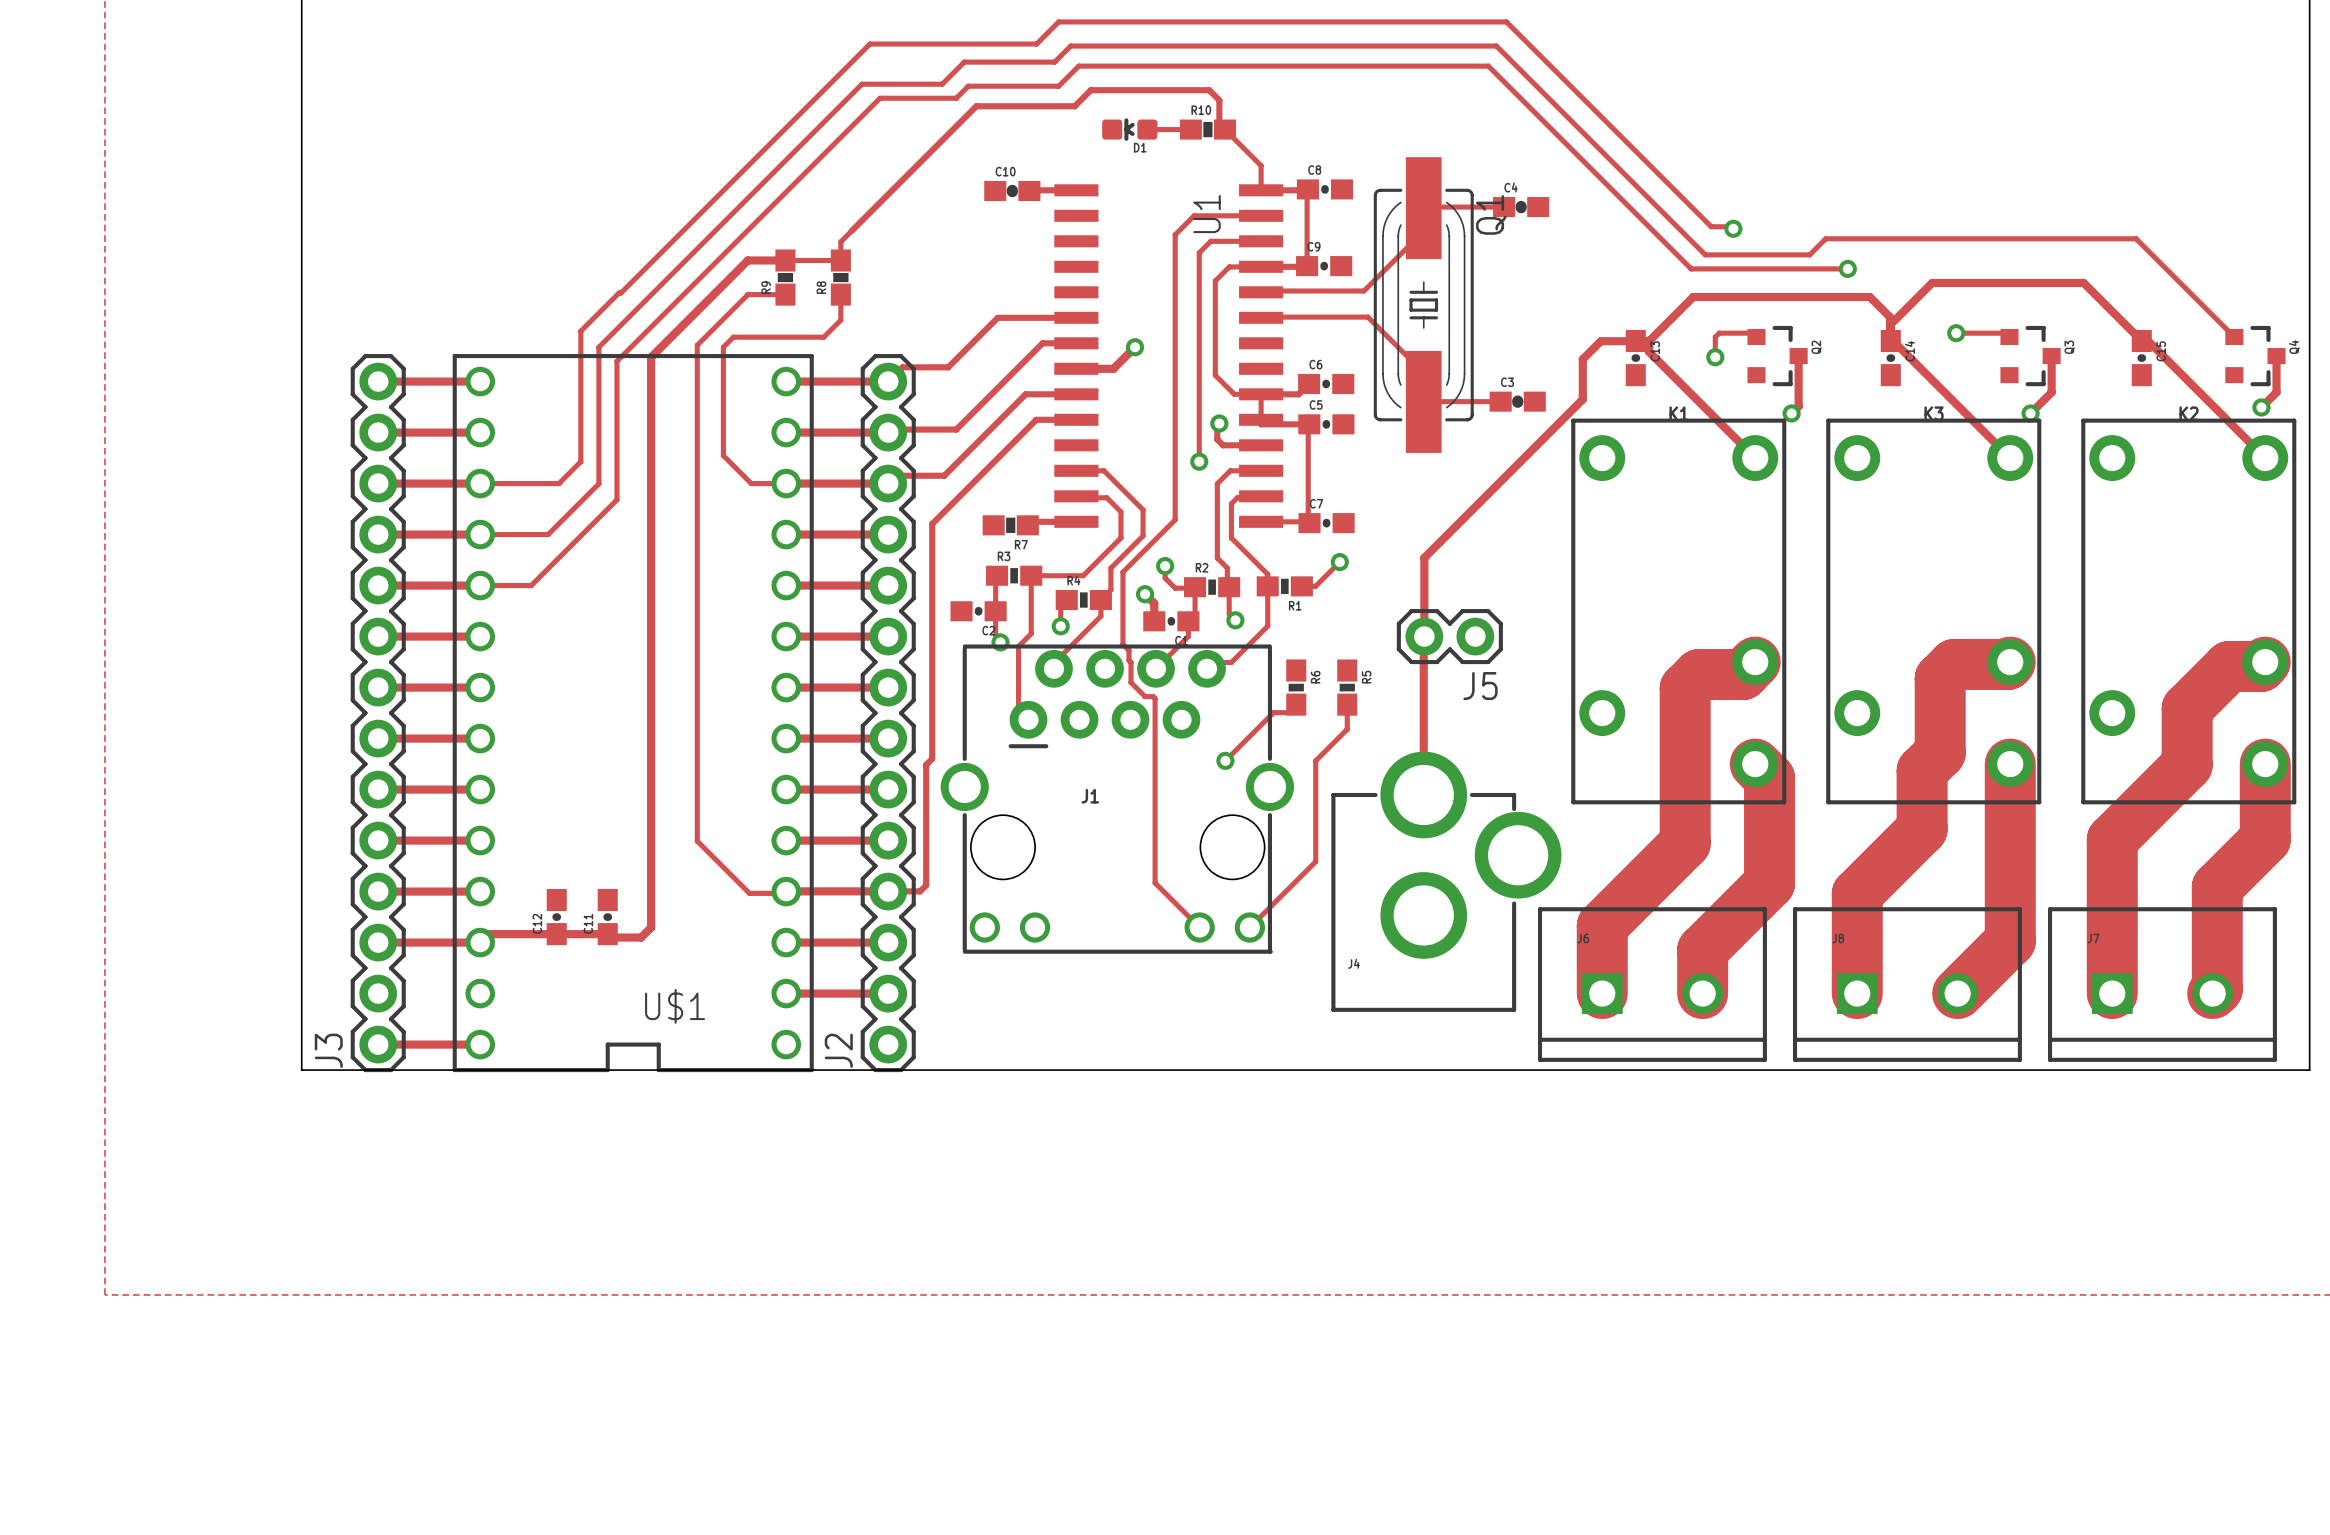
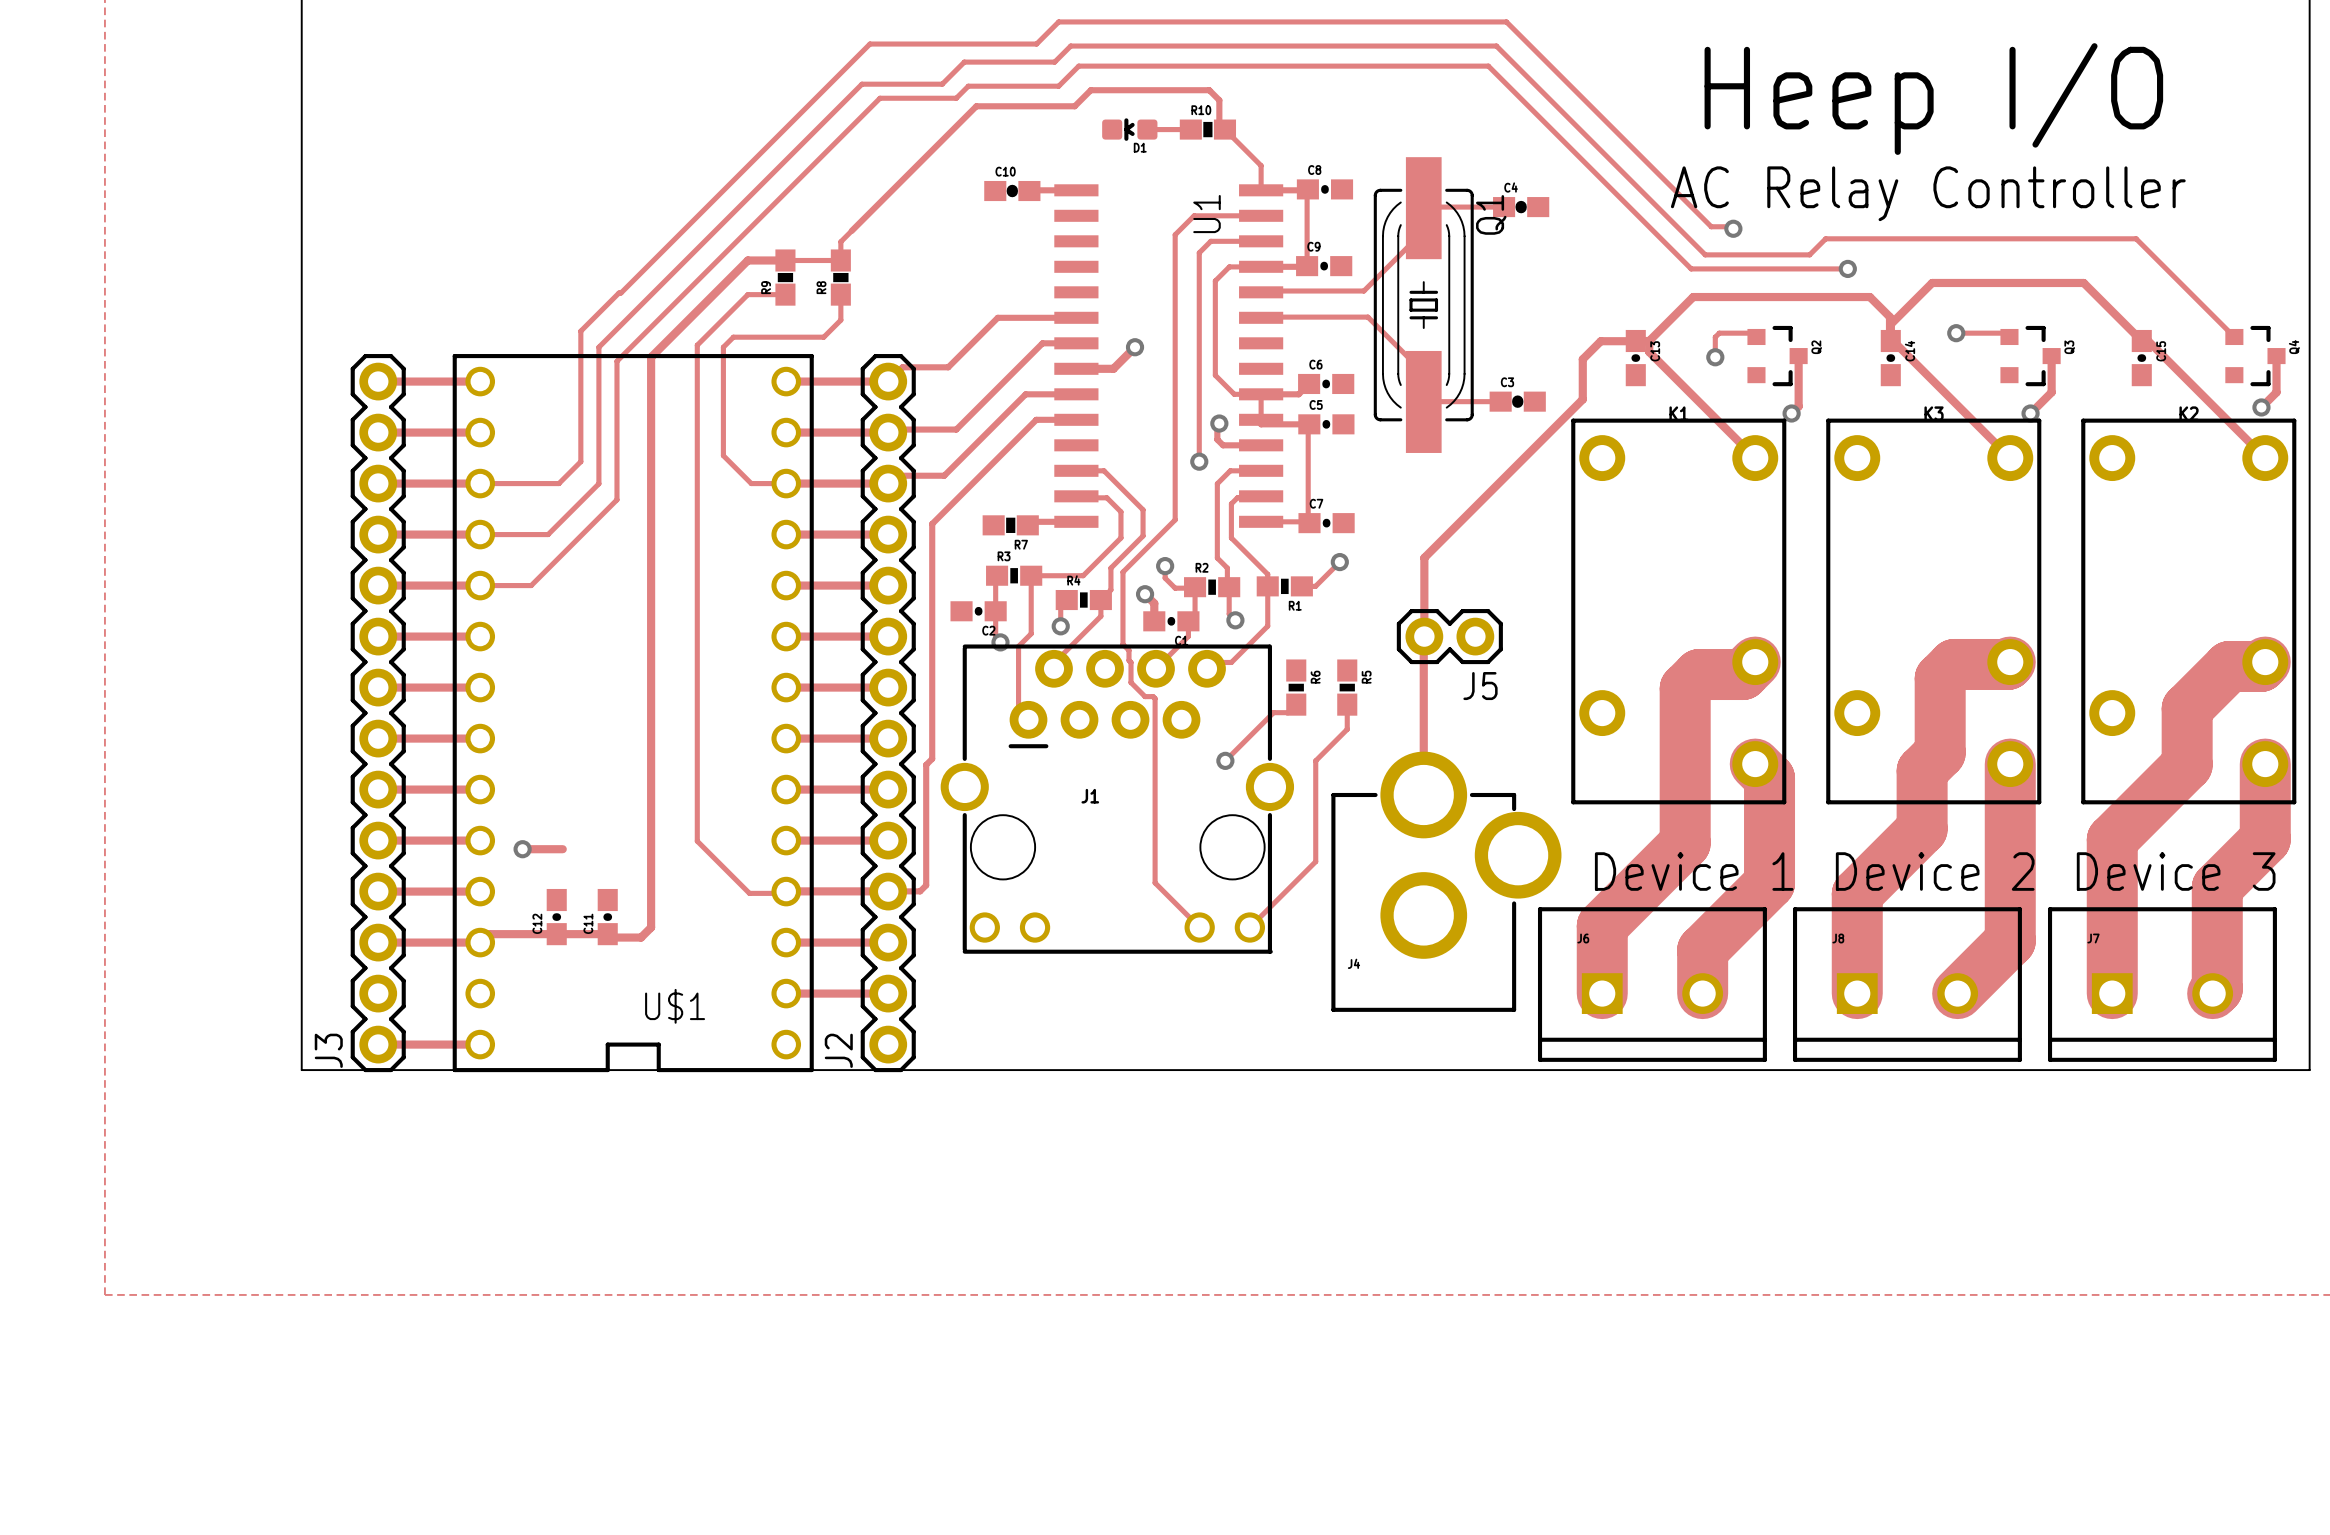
text: none -> Heep I/O (1933, 99)
text: none -> AC Relay Controller (1928, 193)
track: none -> (522, 849) (562, 849)
via: none -> (522, 849)
text: none -> Device 1 (1694, 871)
text: none -> Device 2 (1935, 871)
text: none -> Device 3 (2176, 871)

